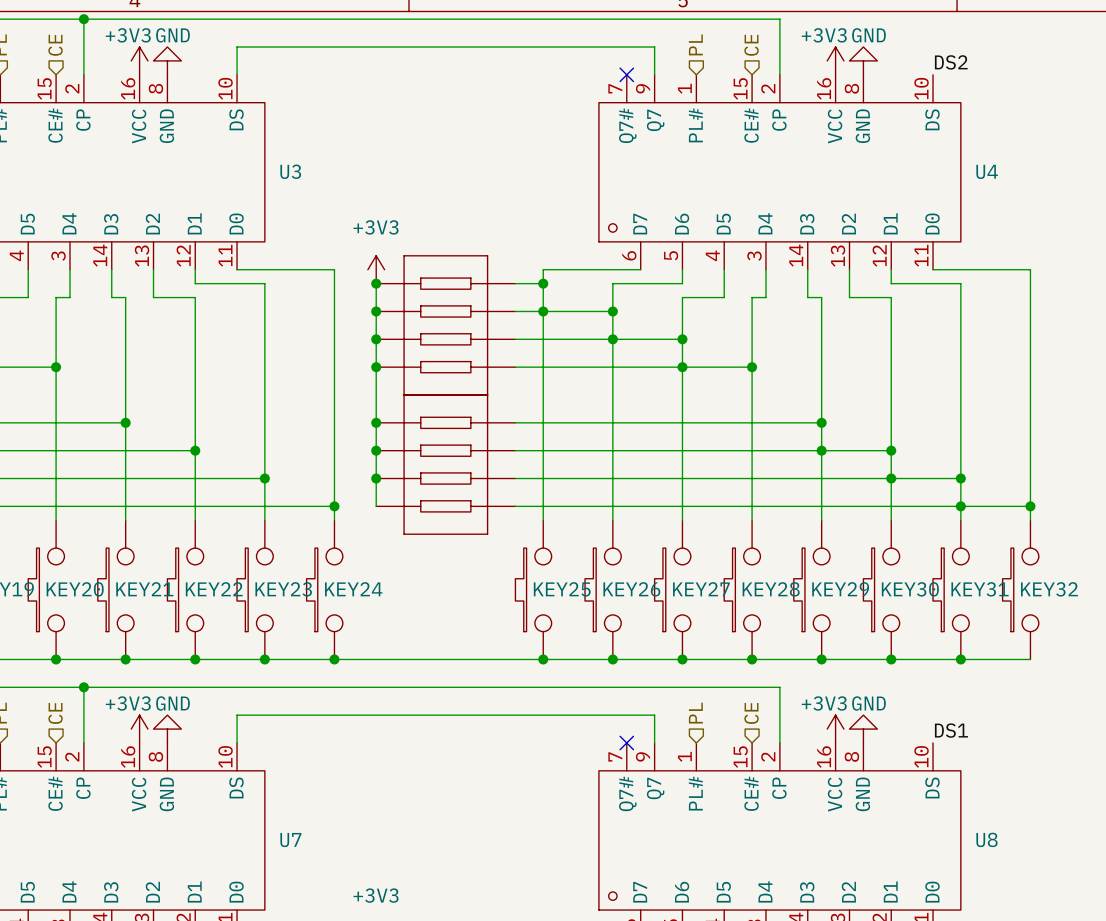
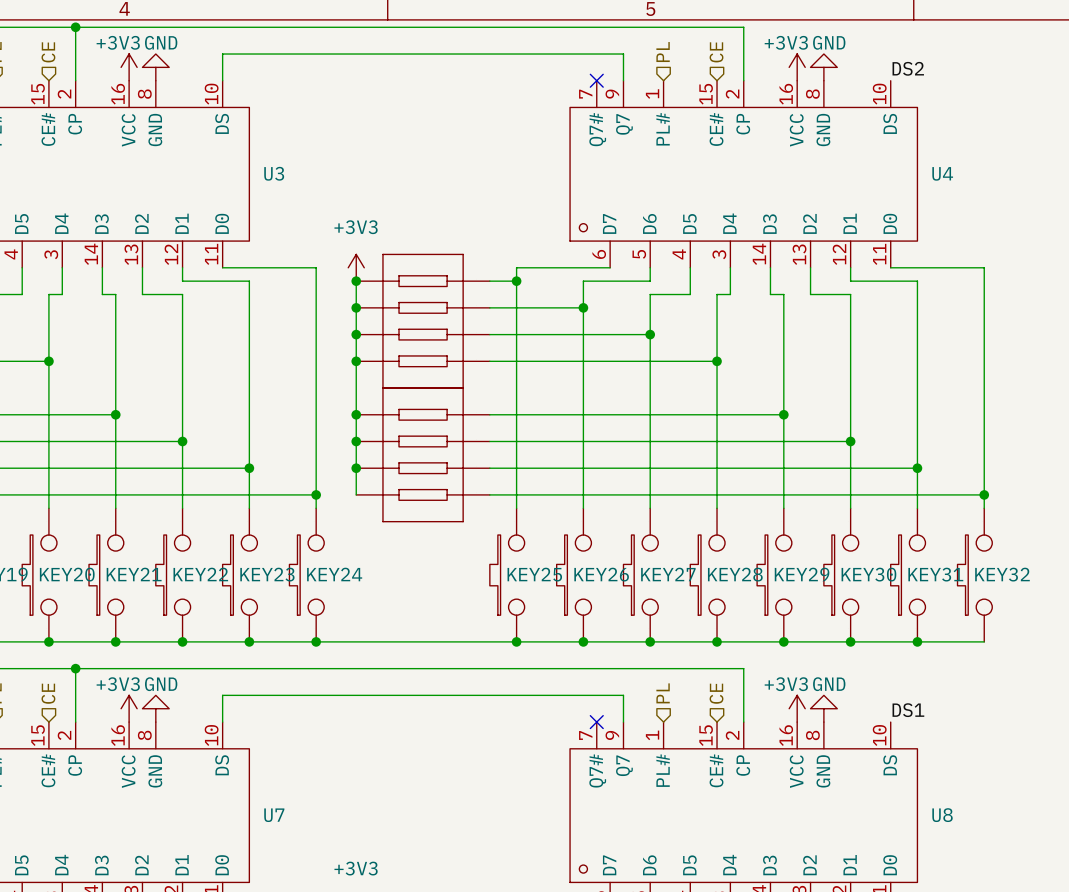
junction: (543, 311) -> none
junction: (612, 339) -> none
junction: (682, 367) -> none
junction: (821, 450) -> none
junction: (891, 478) -> none
junction: (960, 506) -> none

